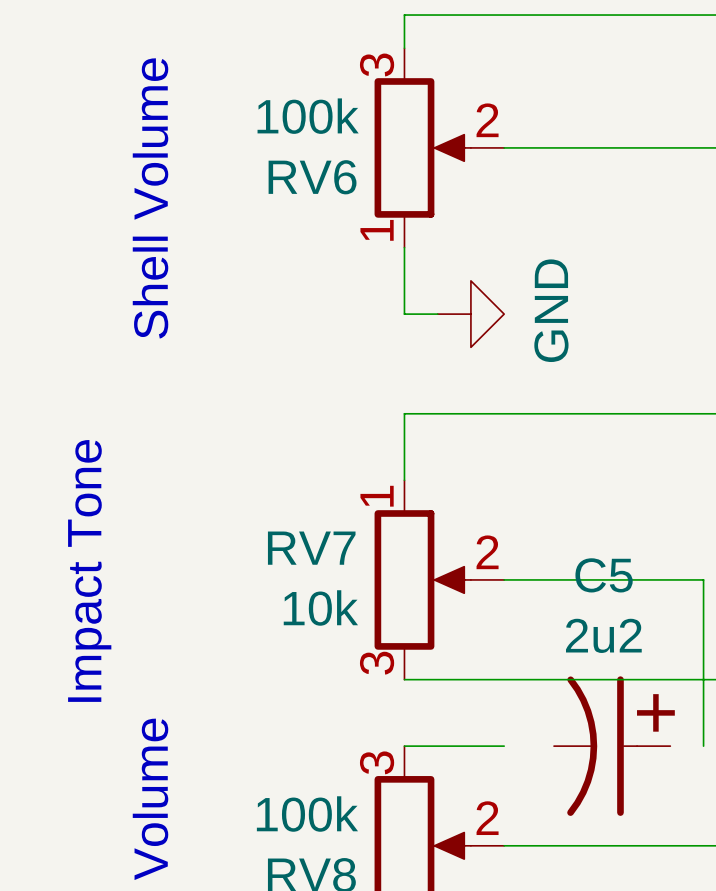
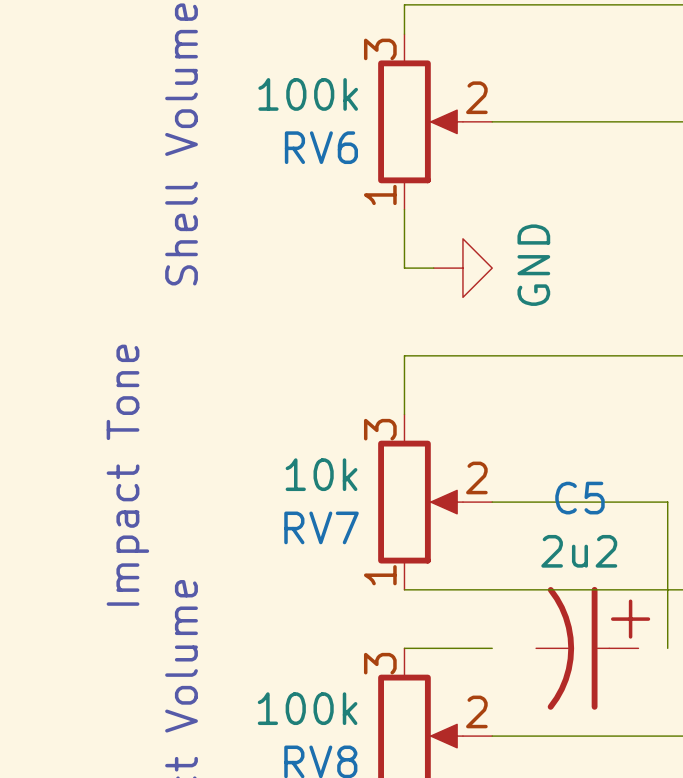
RV7 flip: as is (422, 579) -> up-down (420, 502)

